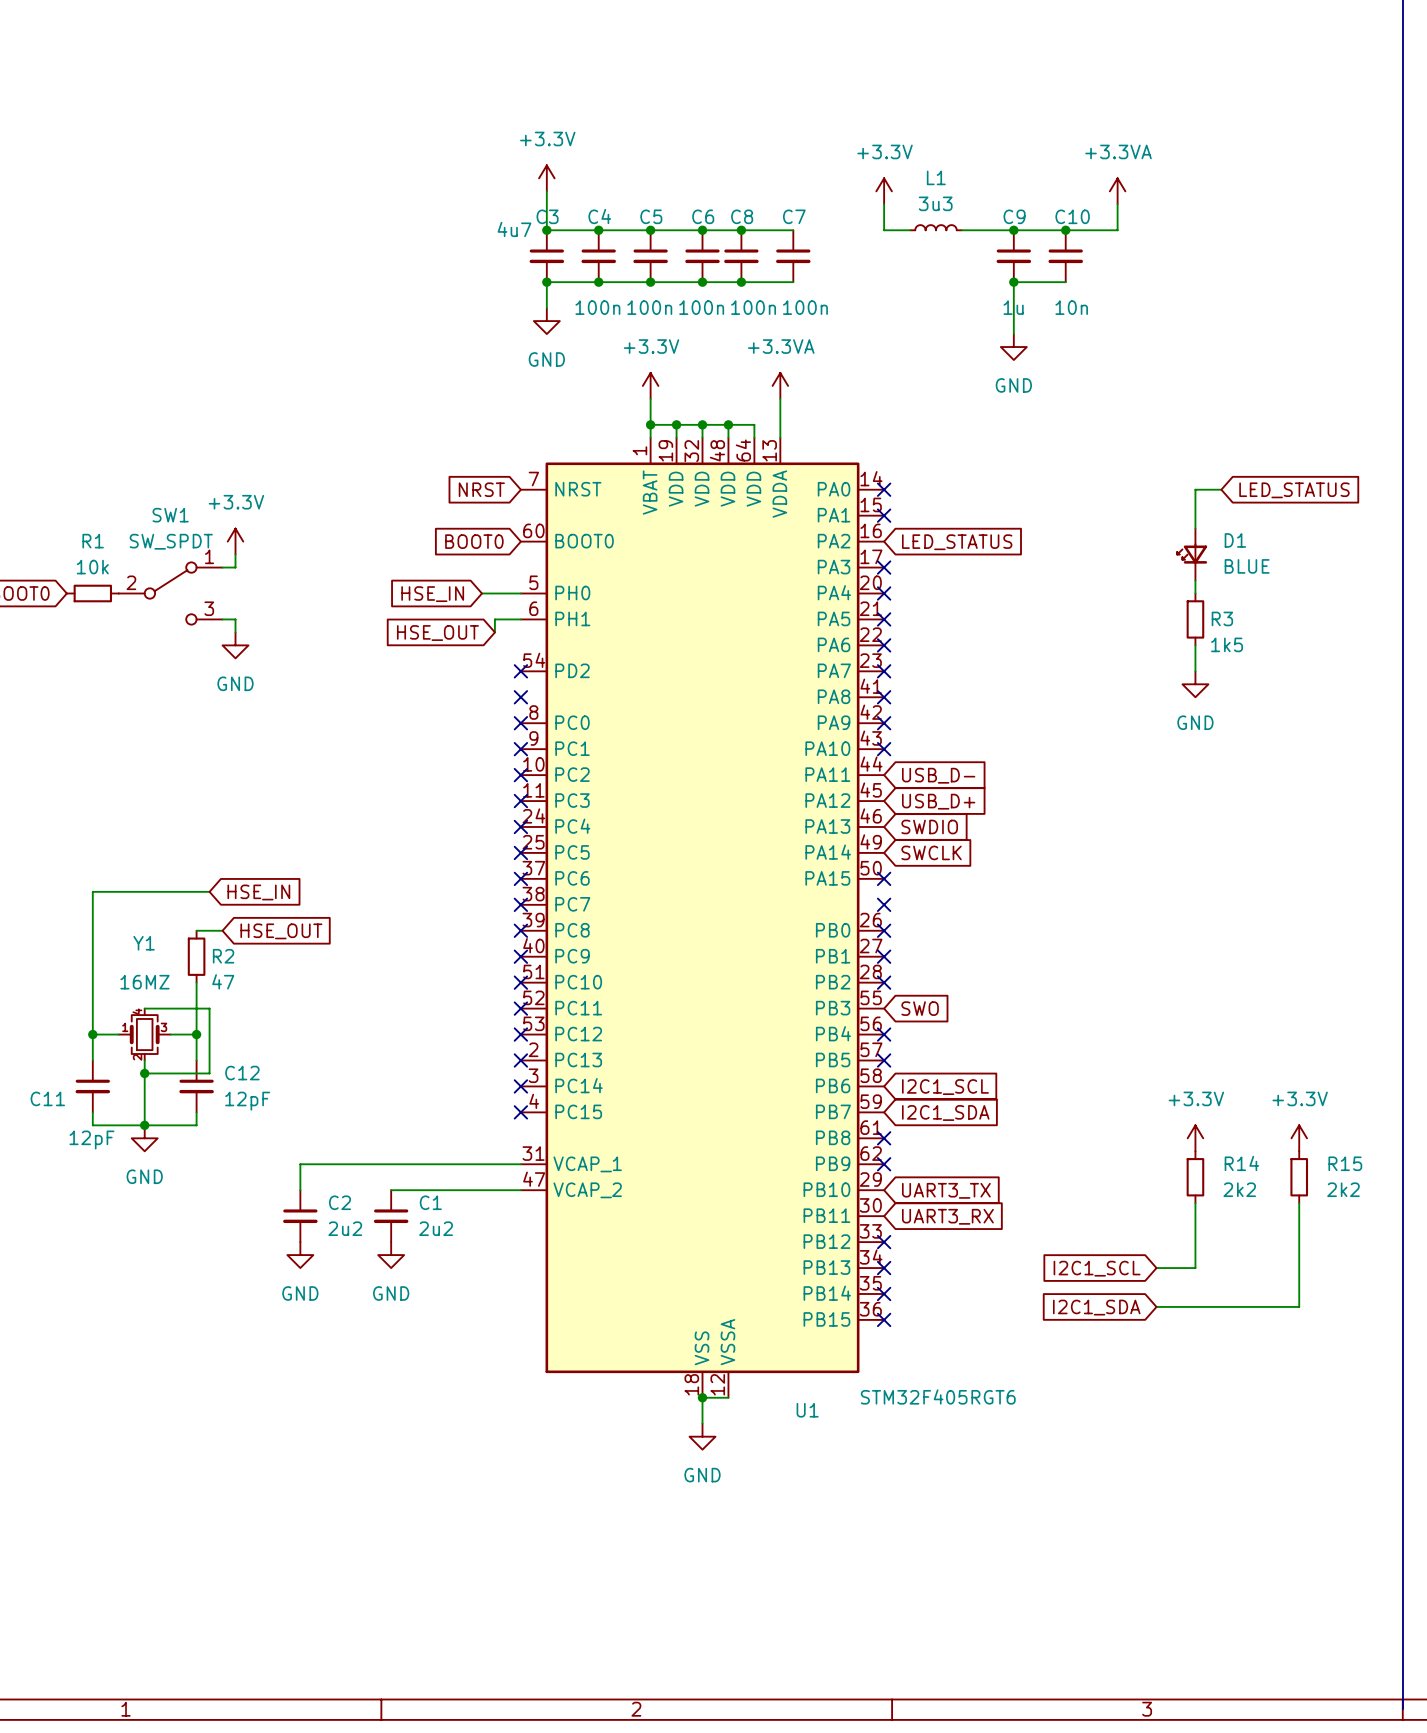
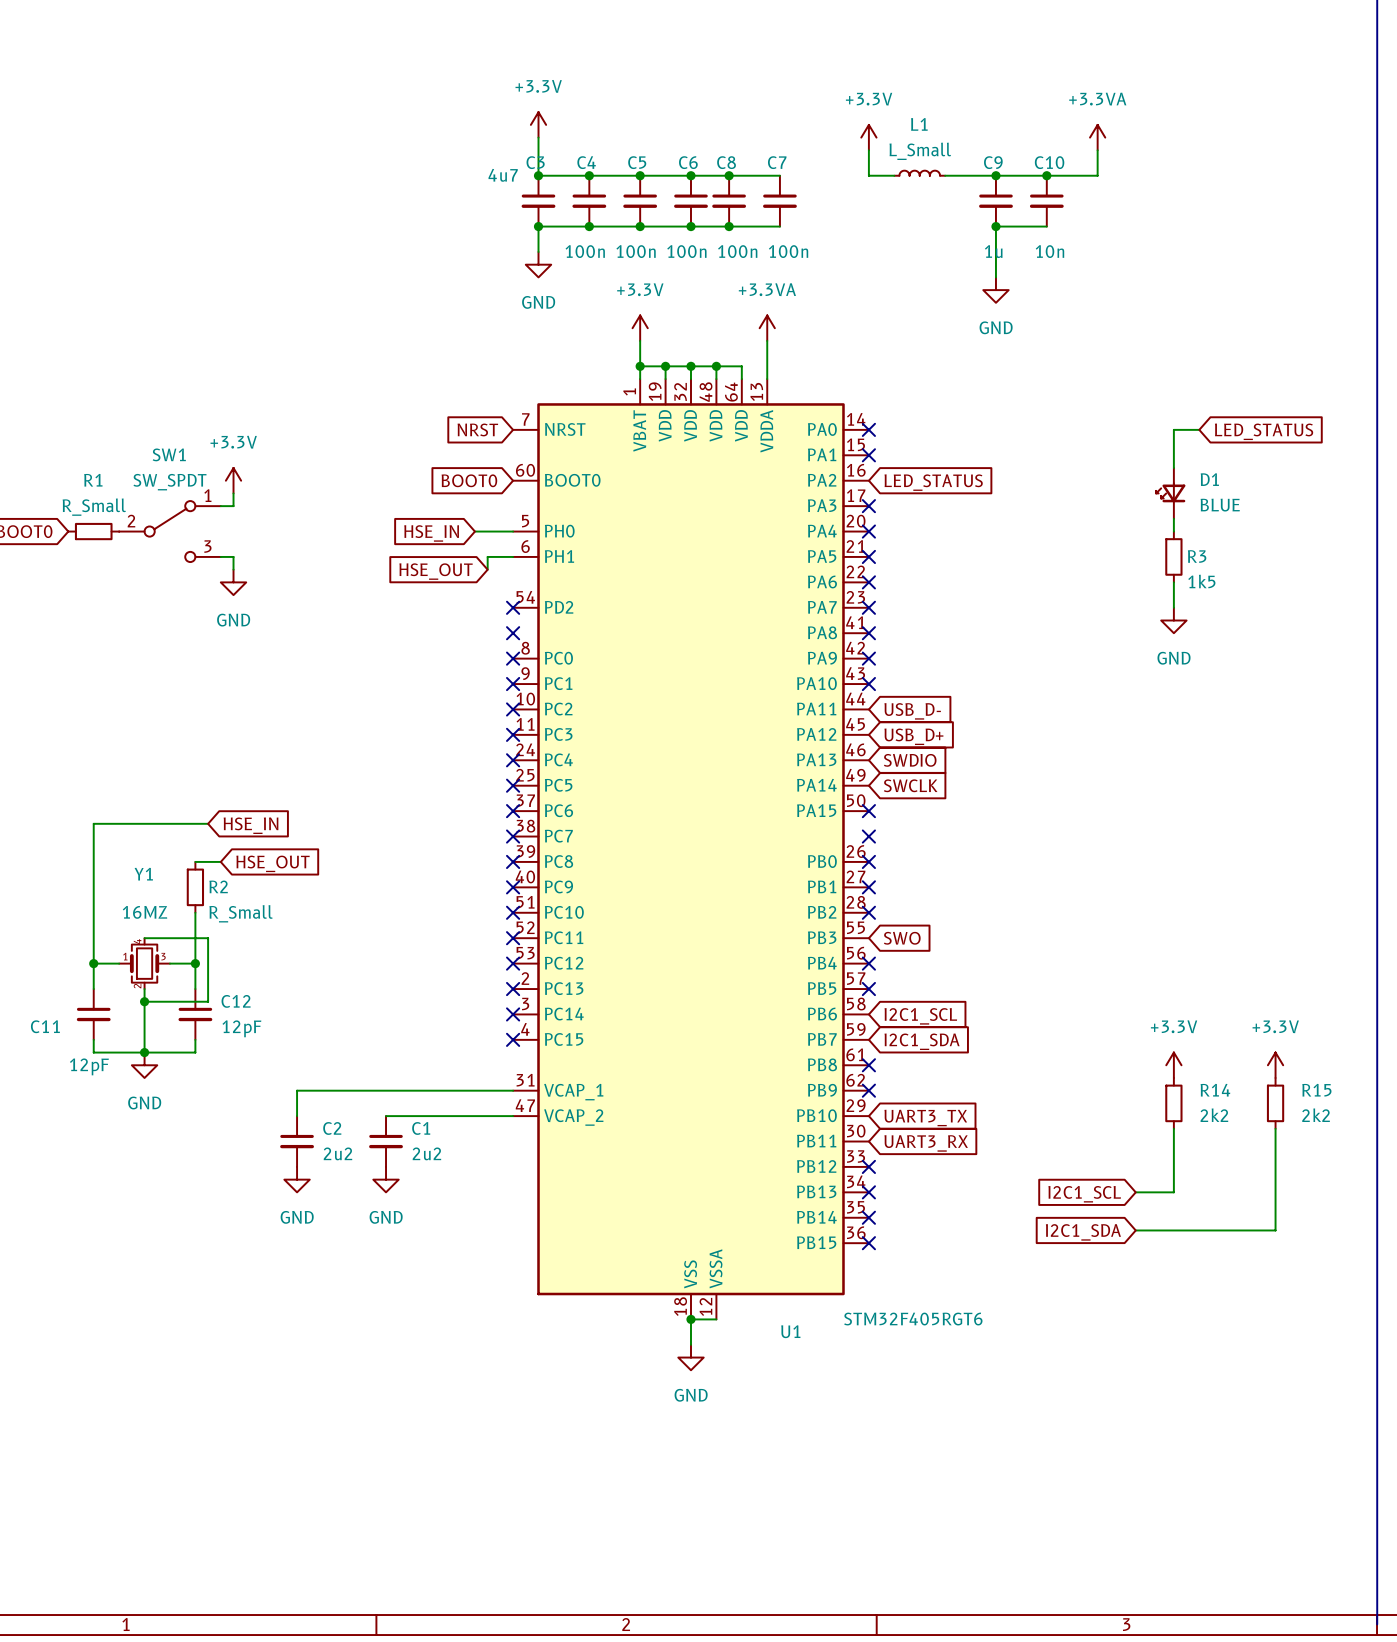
L1 value: 3u3 (935, 203) -> L_Small (920, 151)
R1 value: 10k (92, 567) -> R_Small (94, 507)
R2 value: 47 (223, 981) -> R_Small (241, 913)

